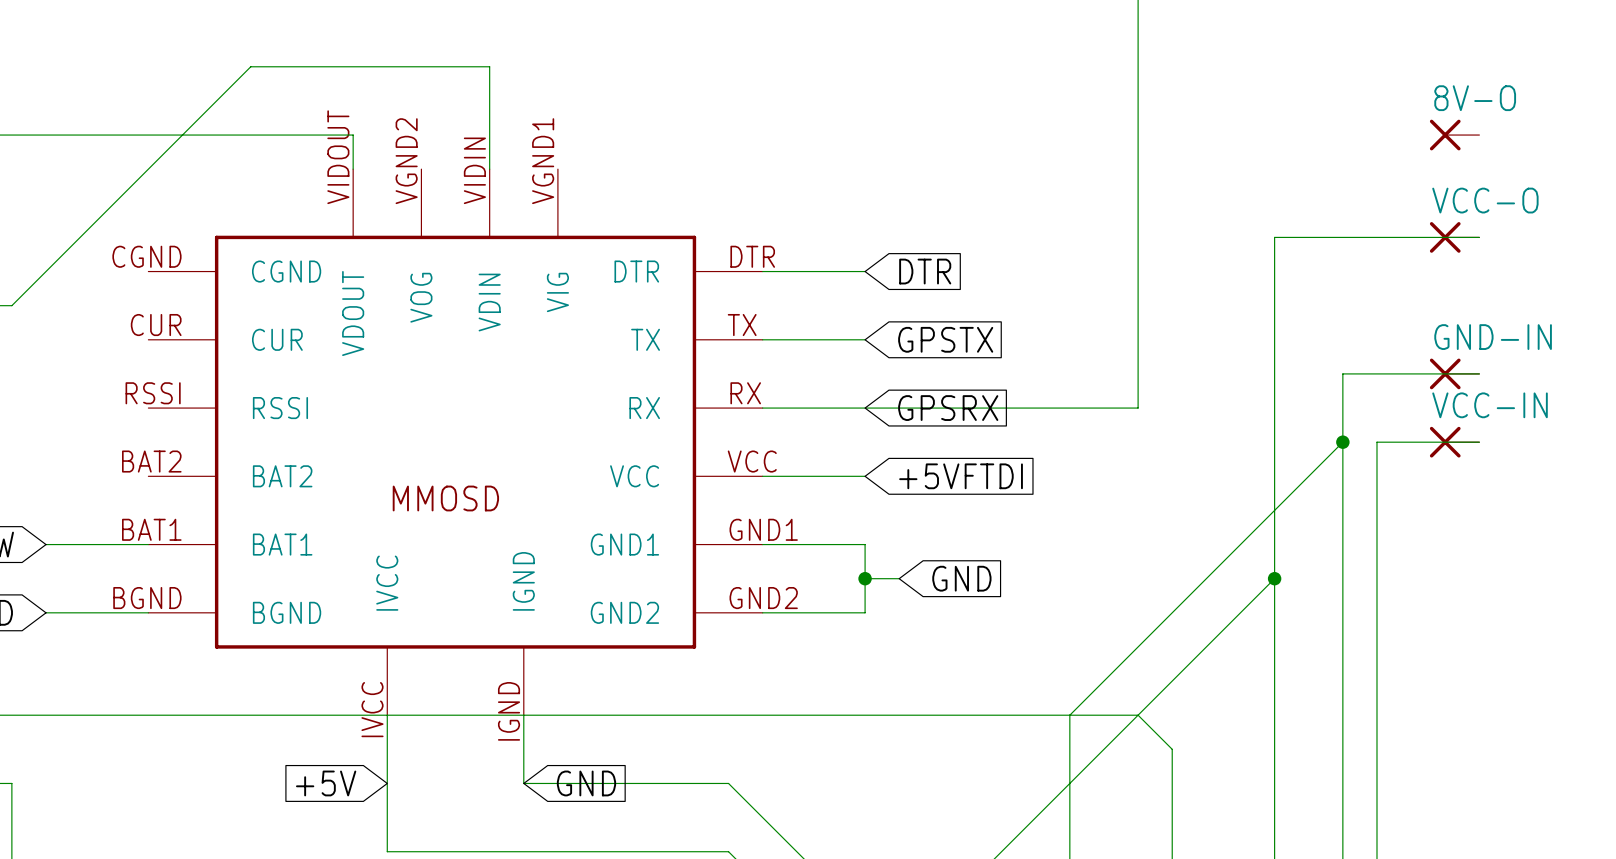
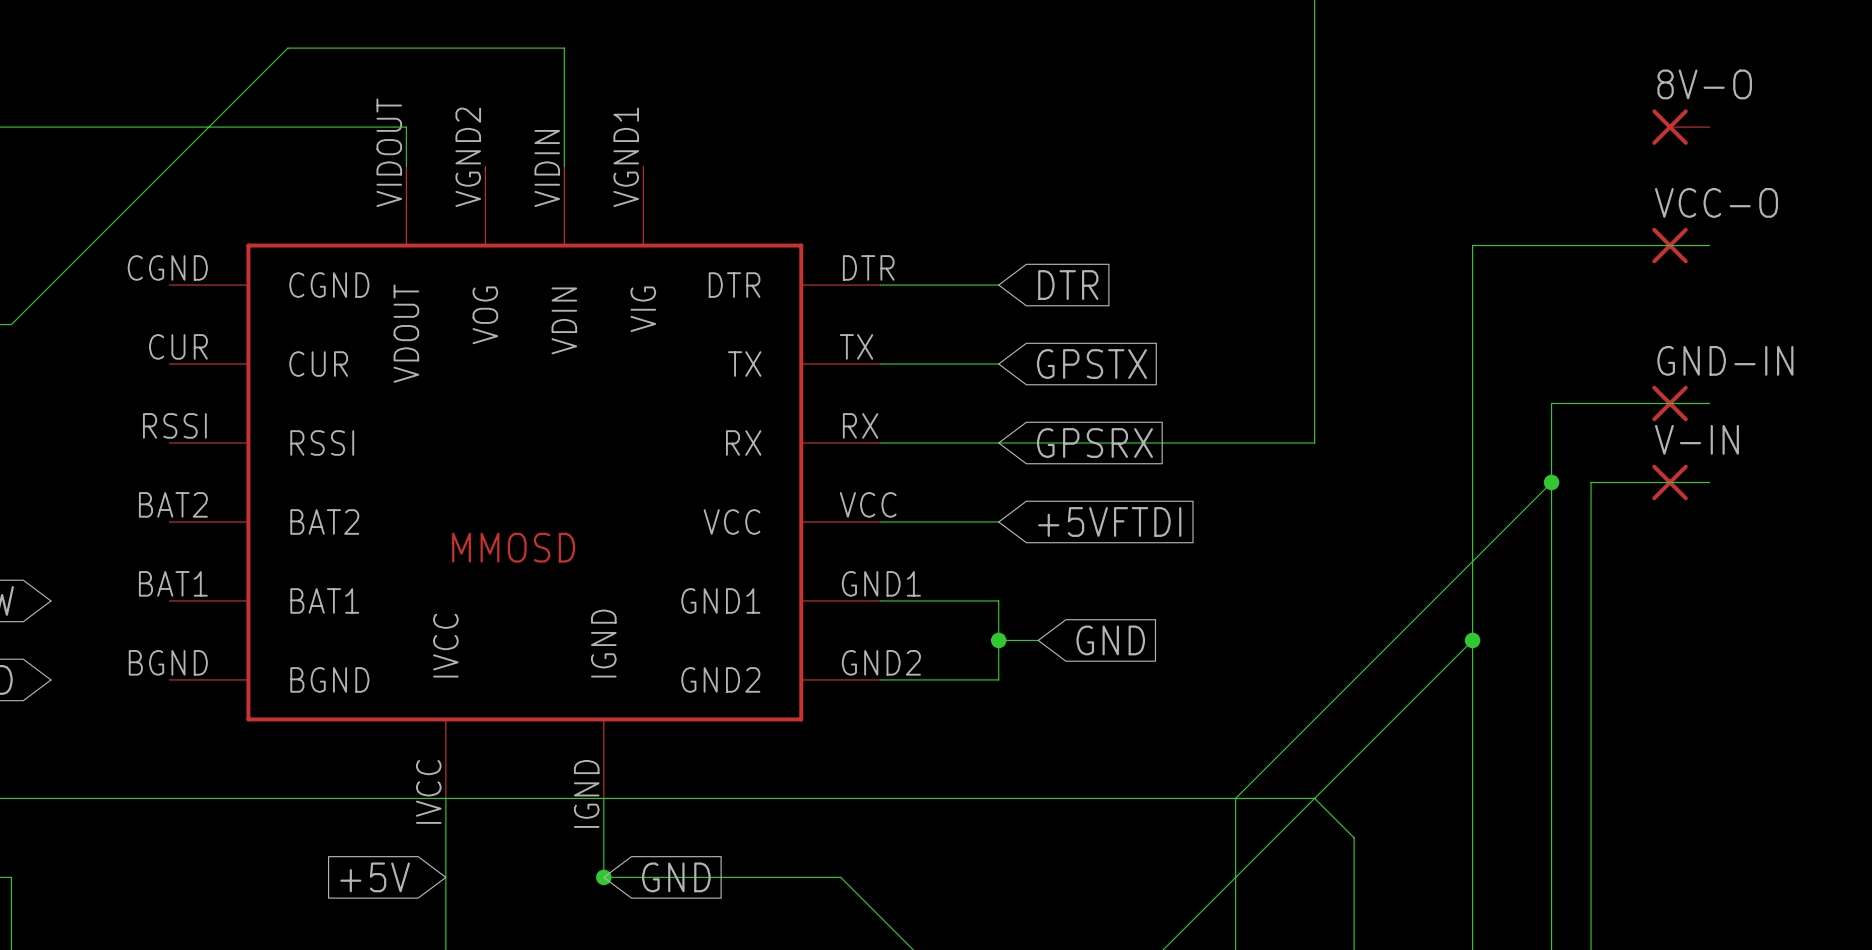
VCC-IN name: VCC-IN (1490, 405) -> V-IN (1696, 439)
wire: (46, 544) (148, 544) -> none
wire: (46, 612) (148, 612) -> none
junction: none -> (603, 877)

